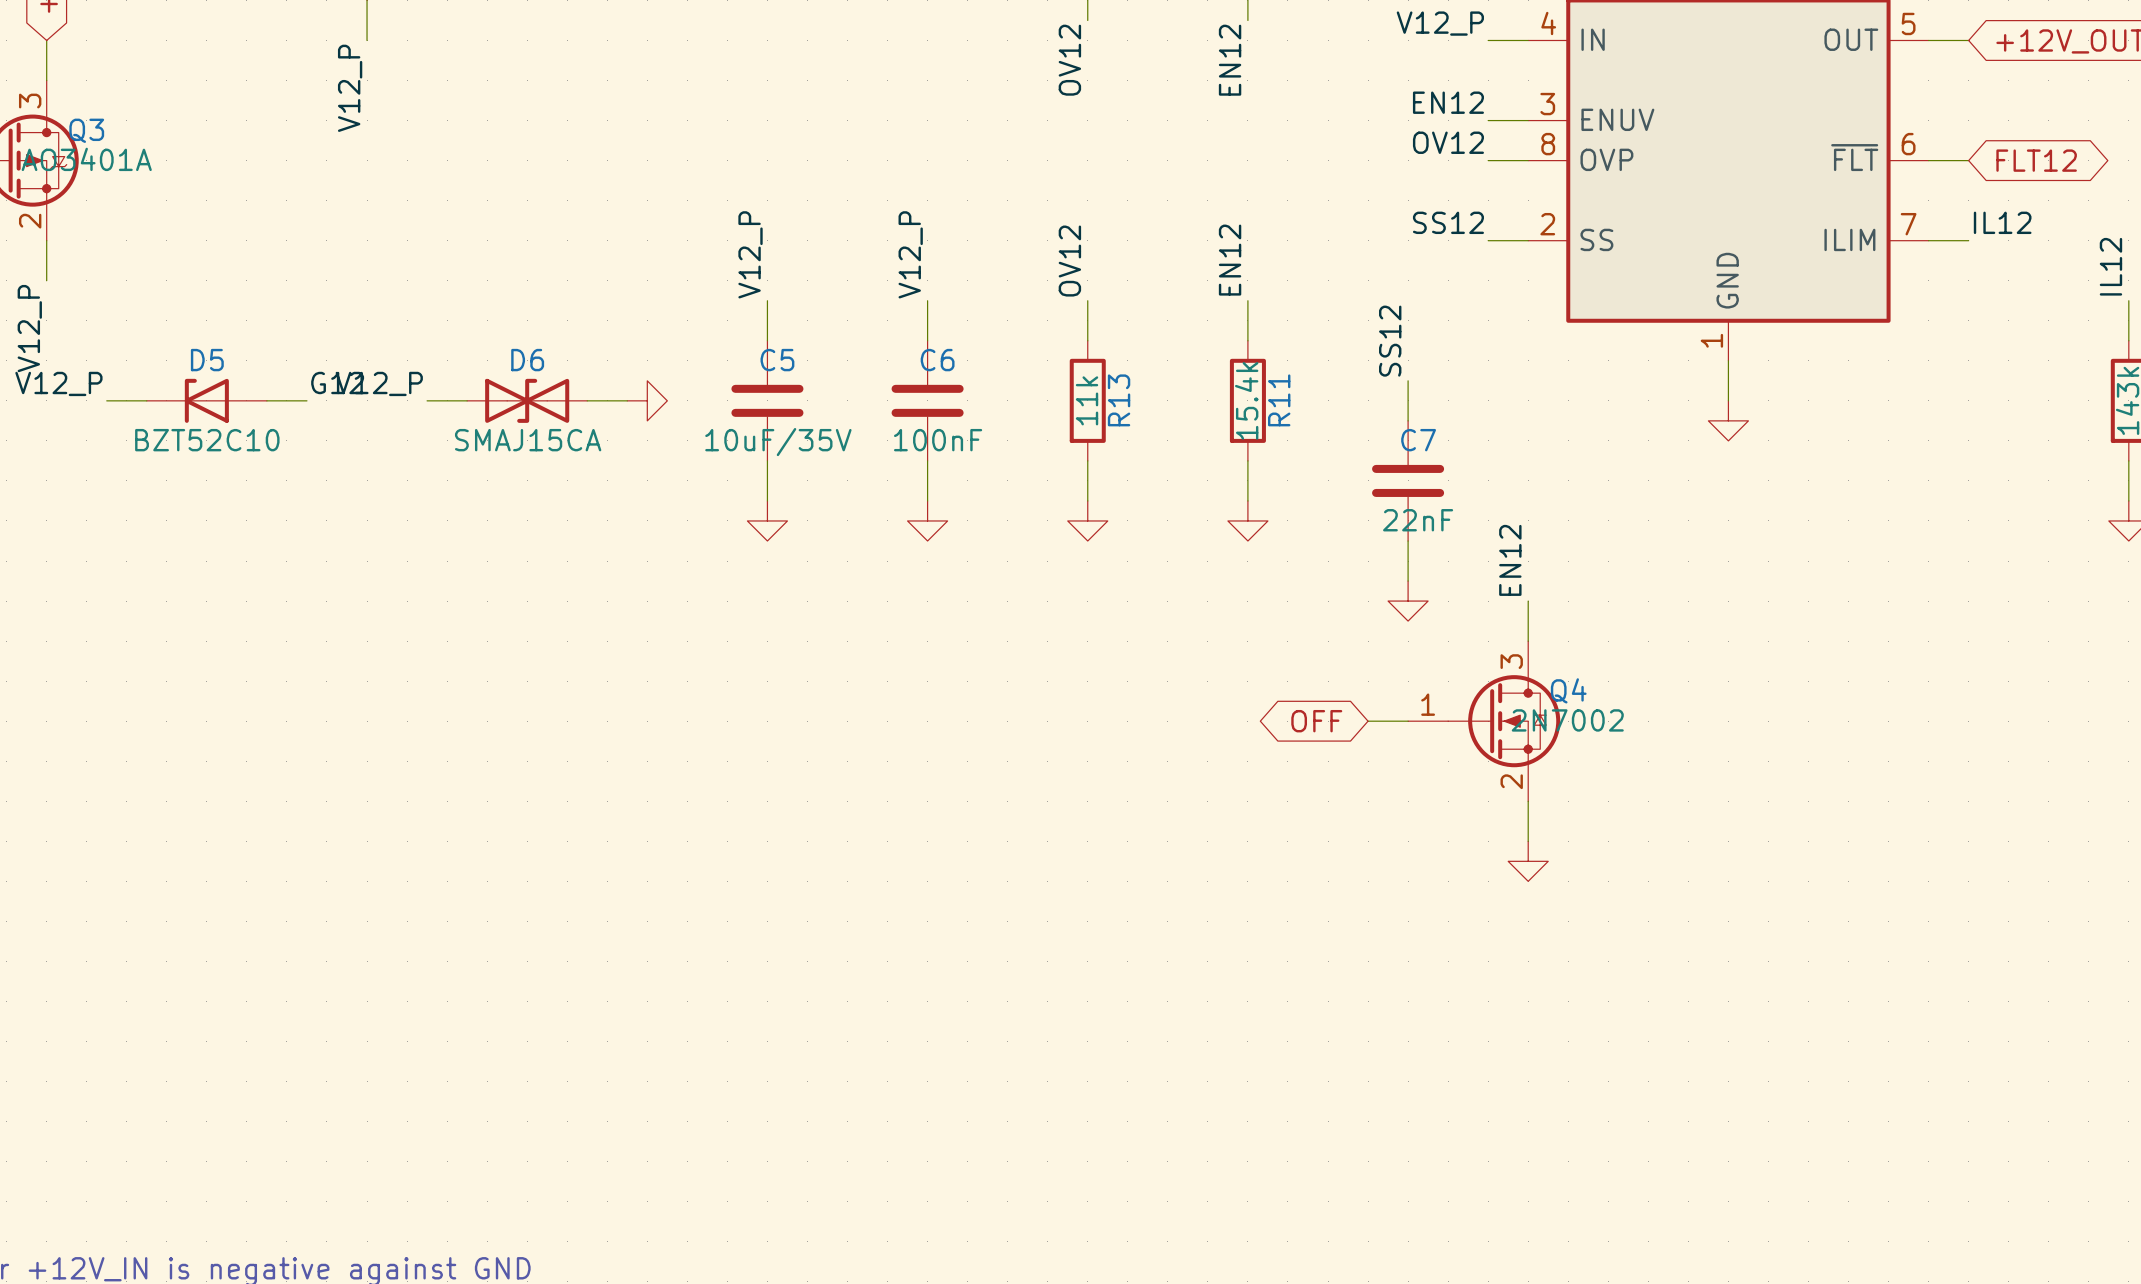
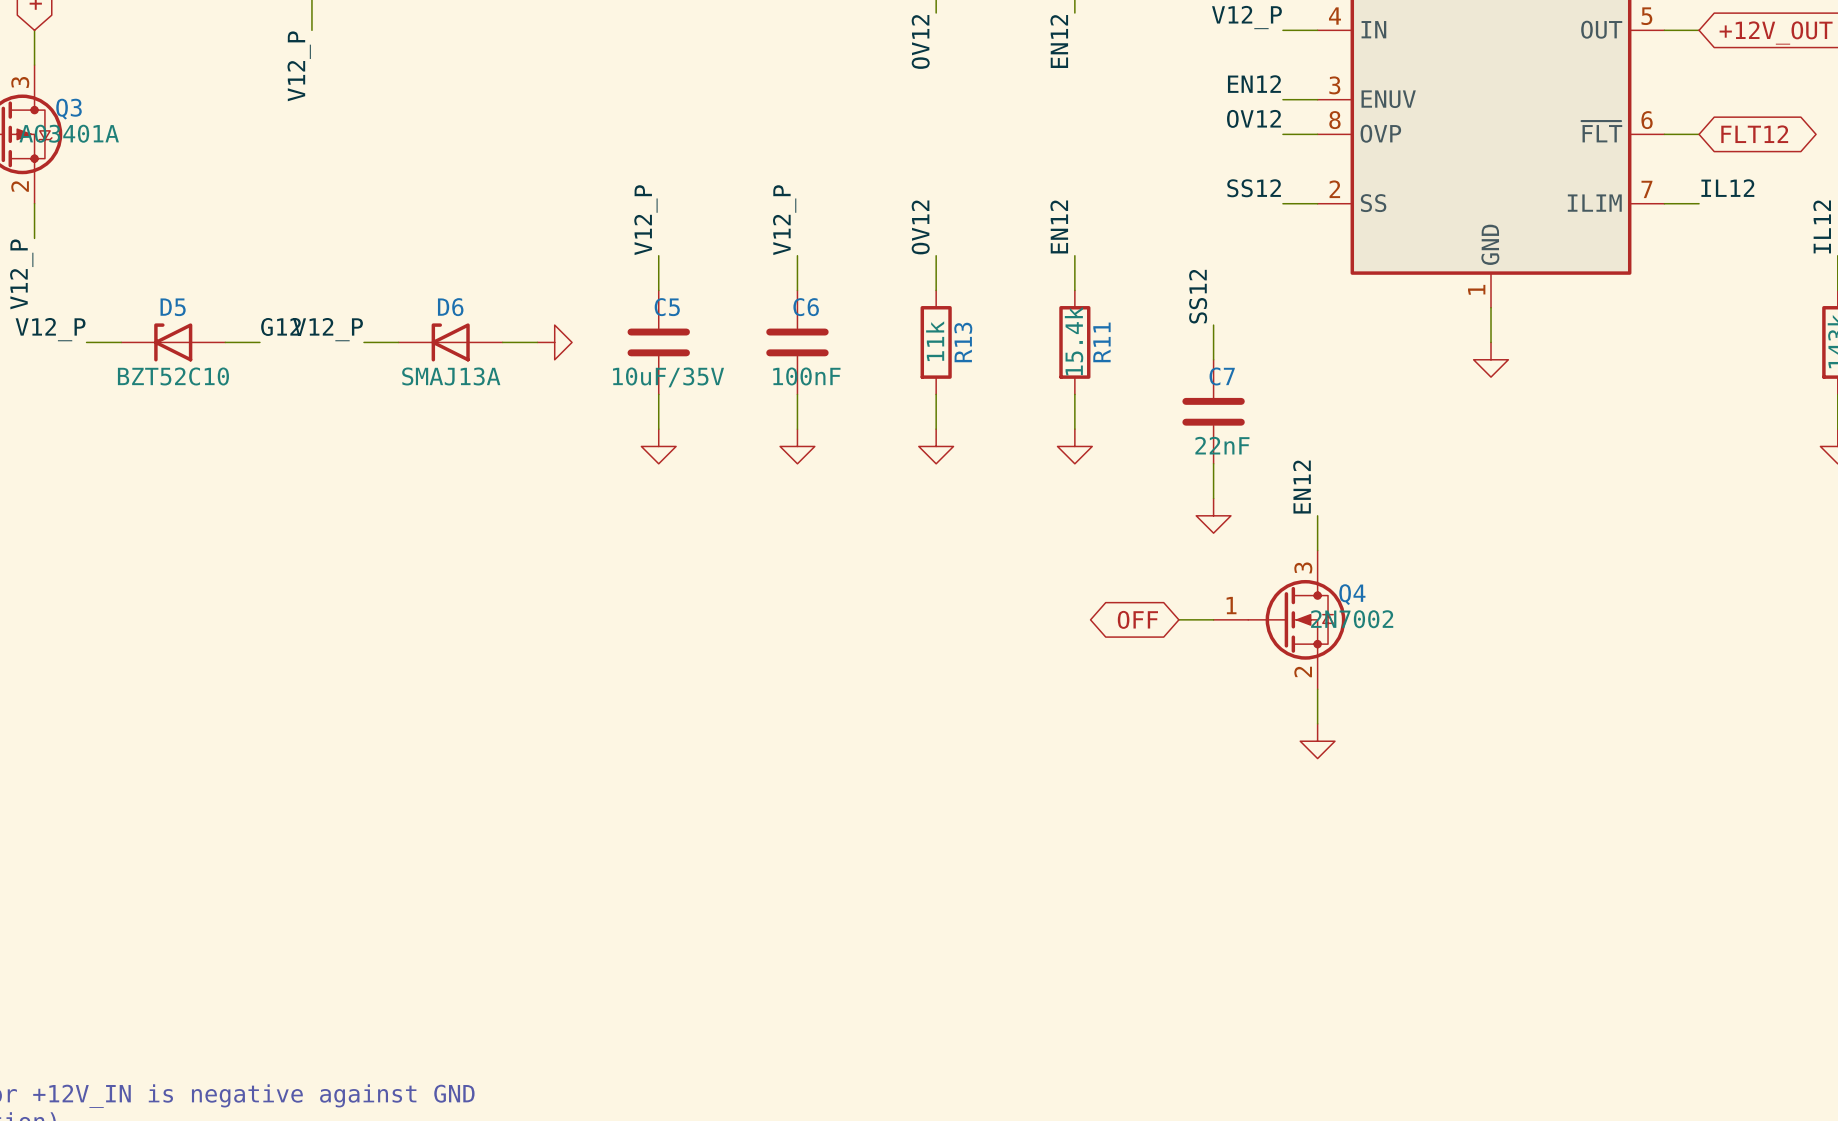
D6 symbol: [467, 378, 588, 423] -> [398, 323, 503, 362]
D6 value: SMAJ15CA (528, 440) -> SMAJ13A (451, 376)

